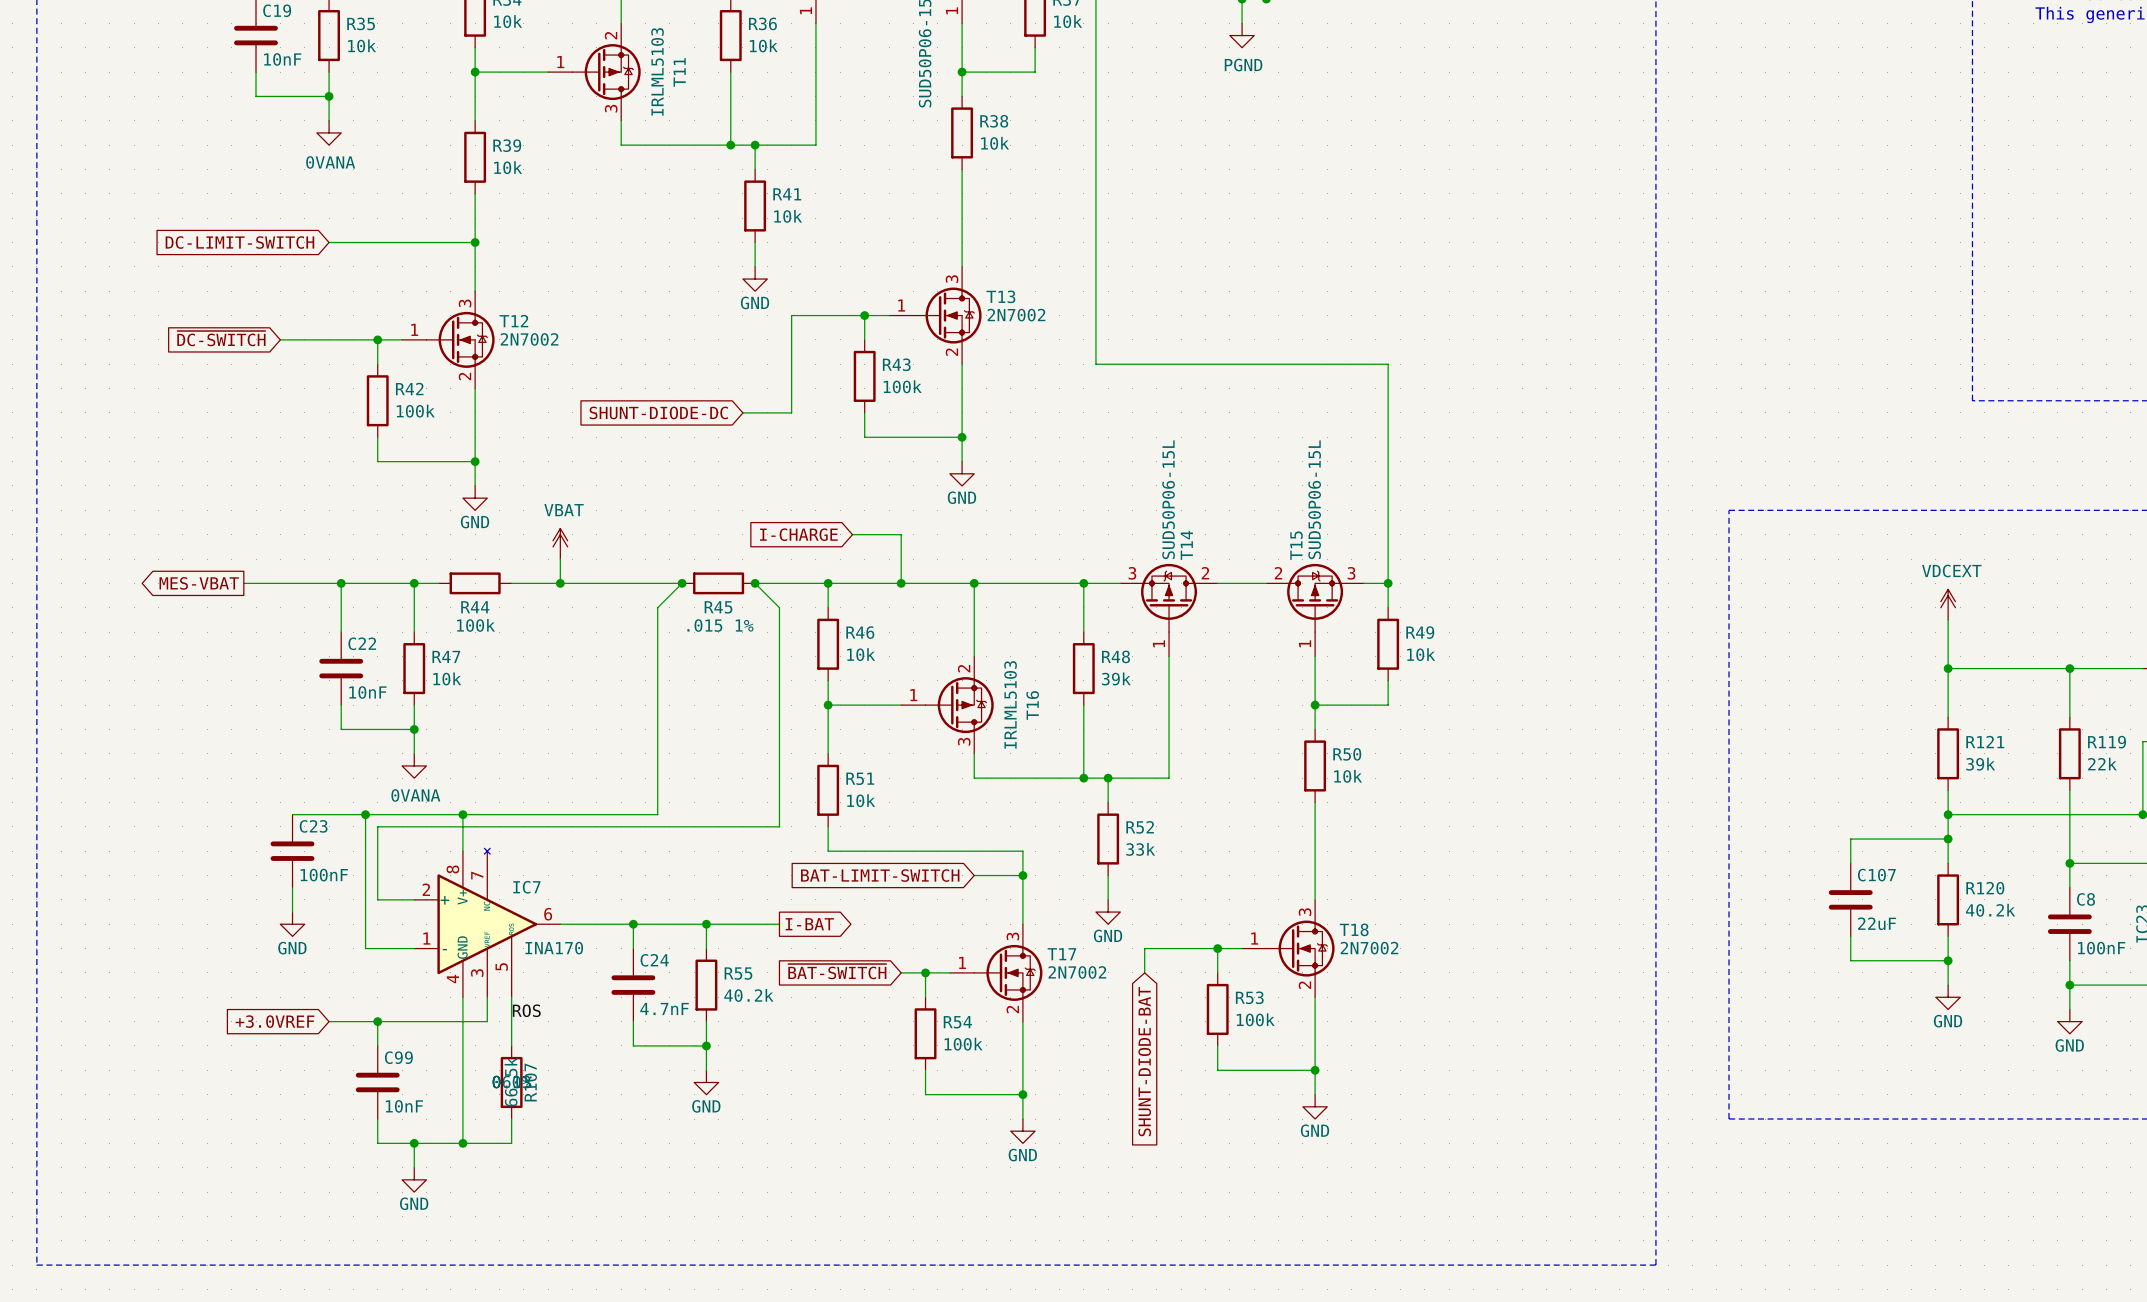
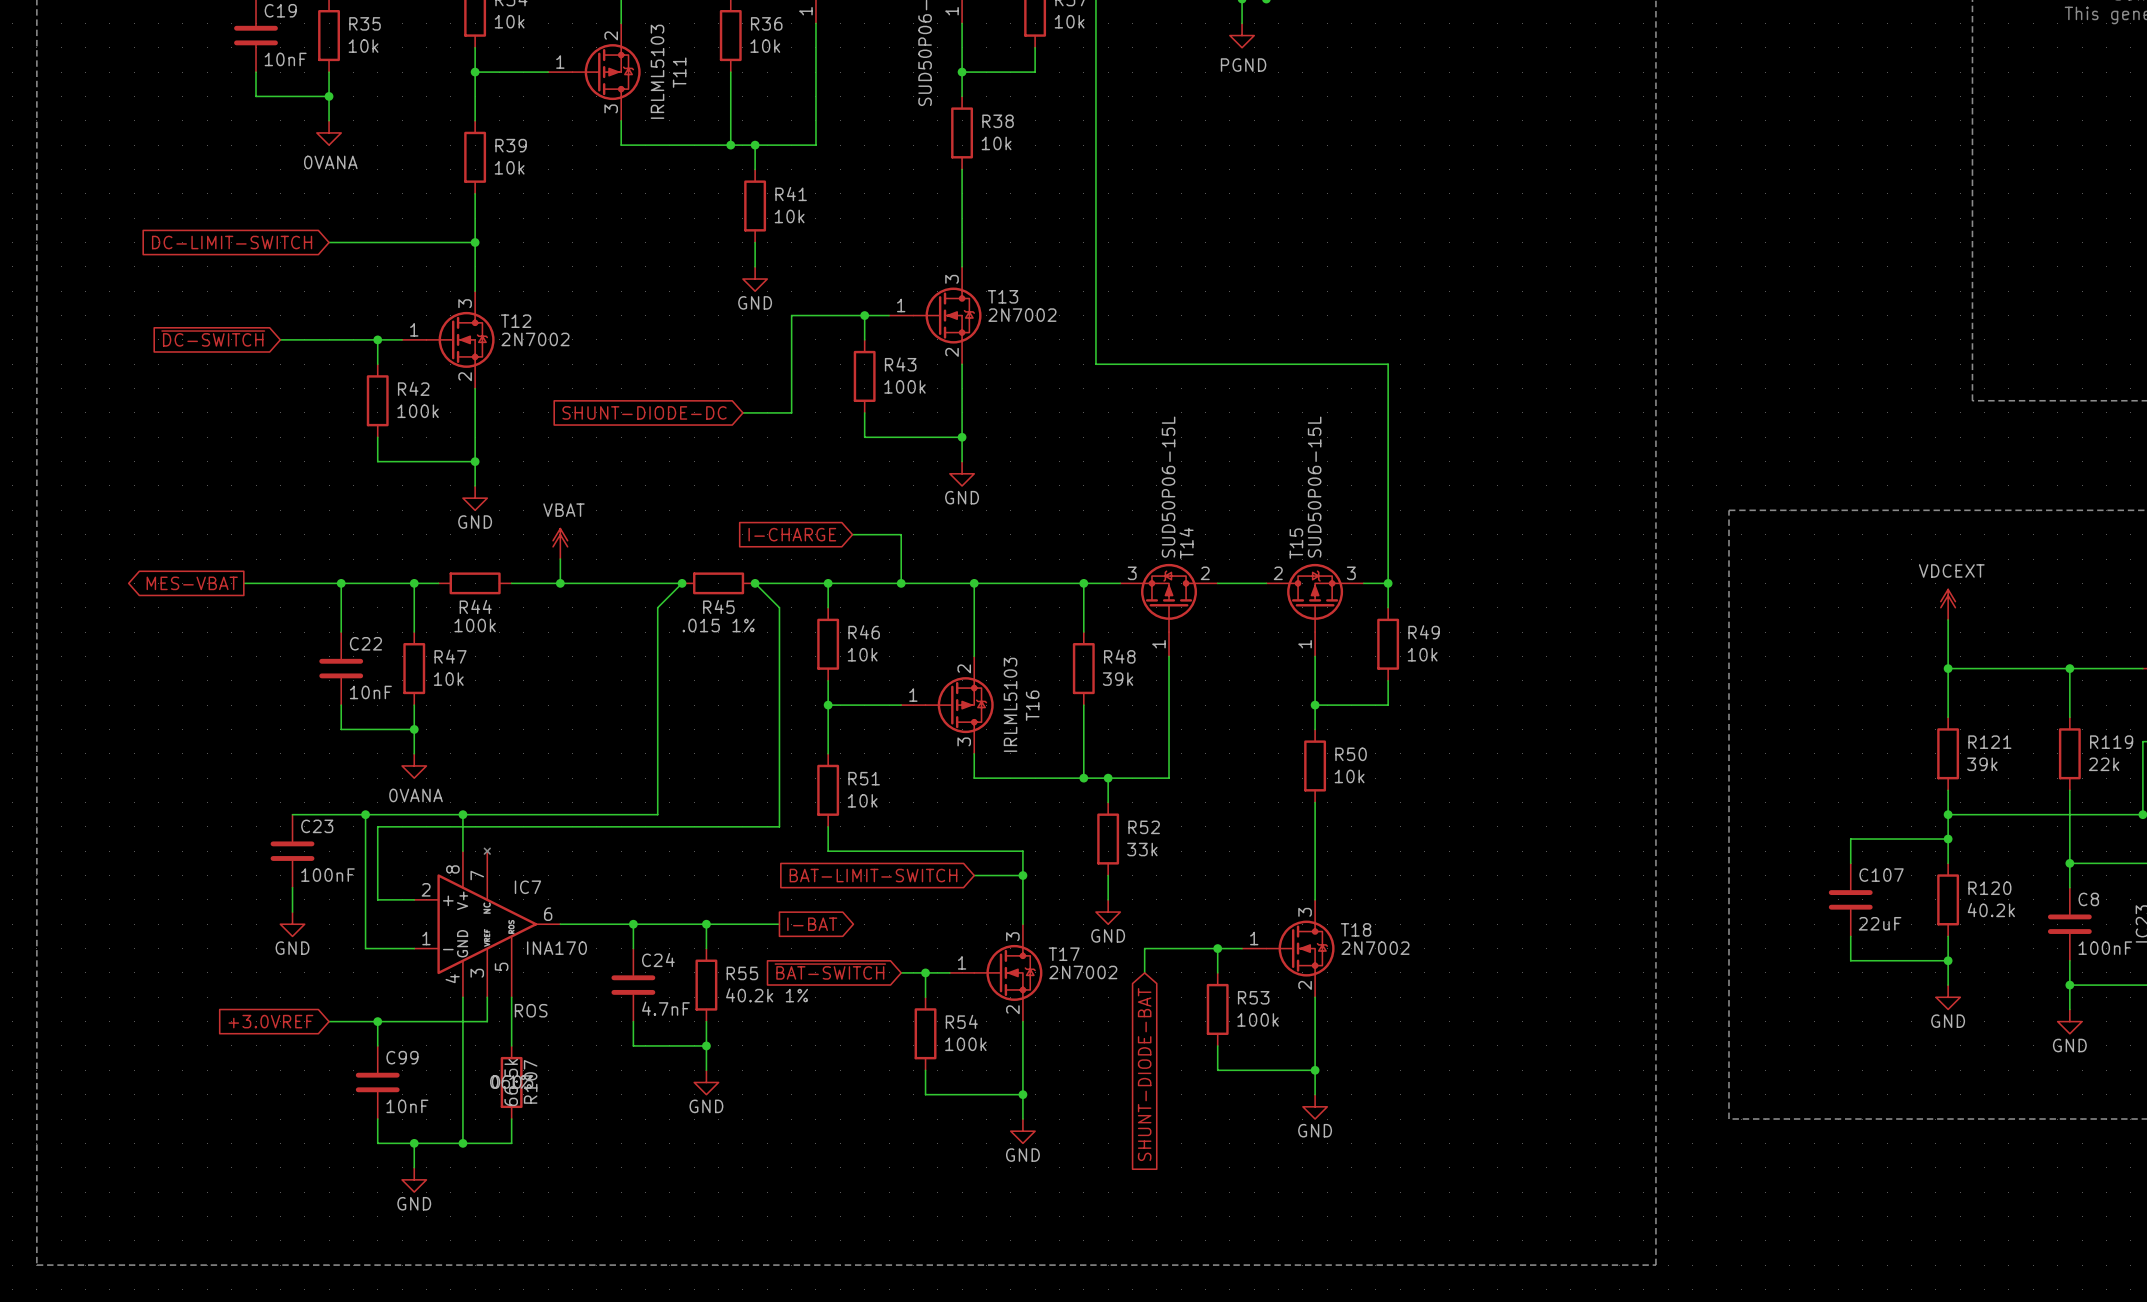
R55 value: 40.2k (748, 995) -> 40.2k 1% (767, 995)

